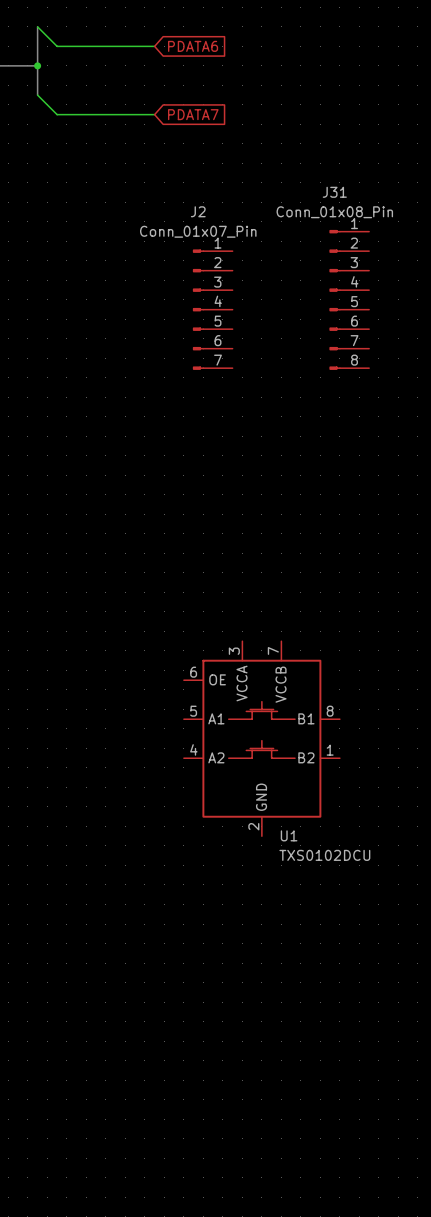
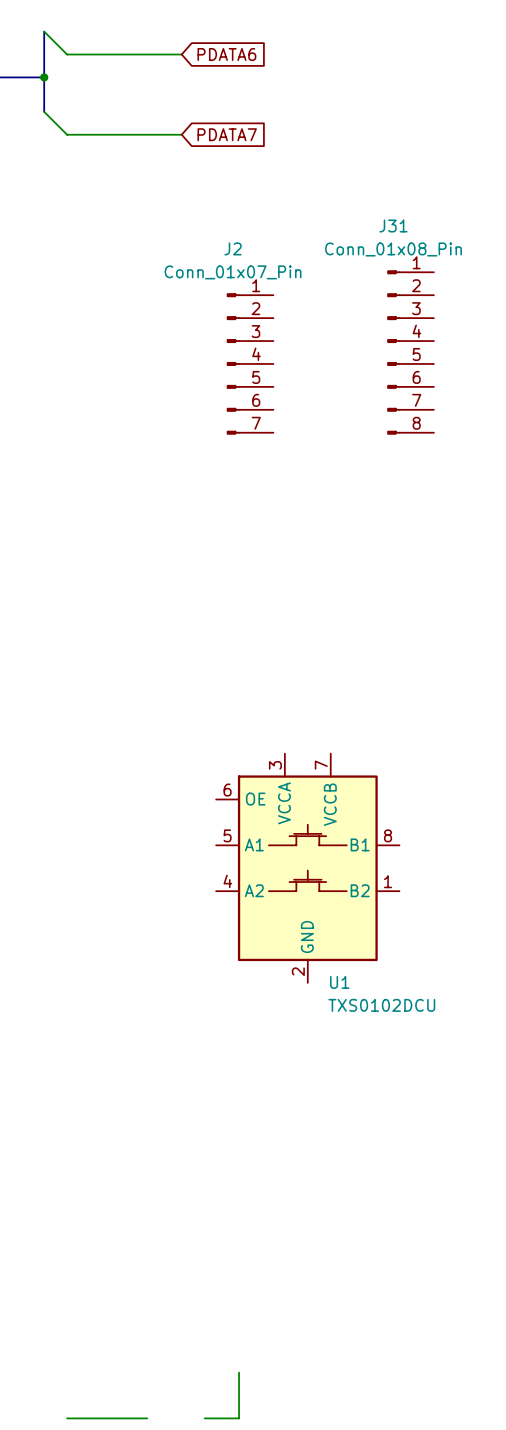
wire: none -> (239, 1372) (239, 1418) (204, 1418)
wire: none -> (67, 1418) (147, 1418)

